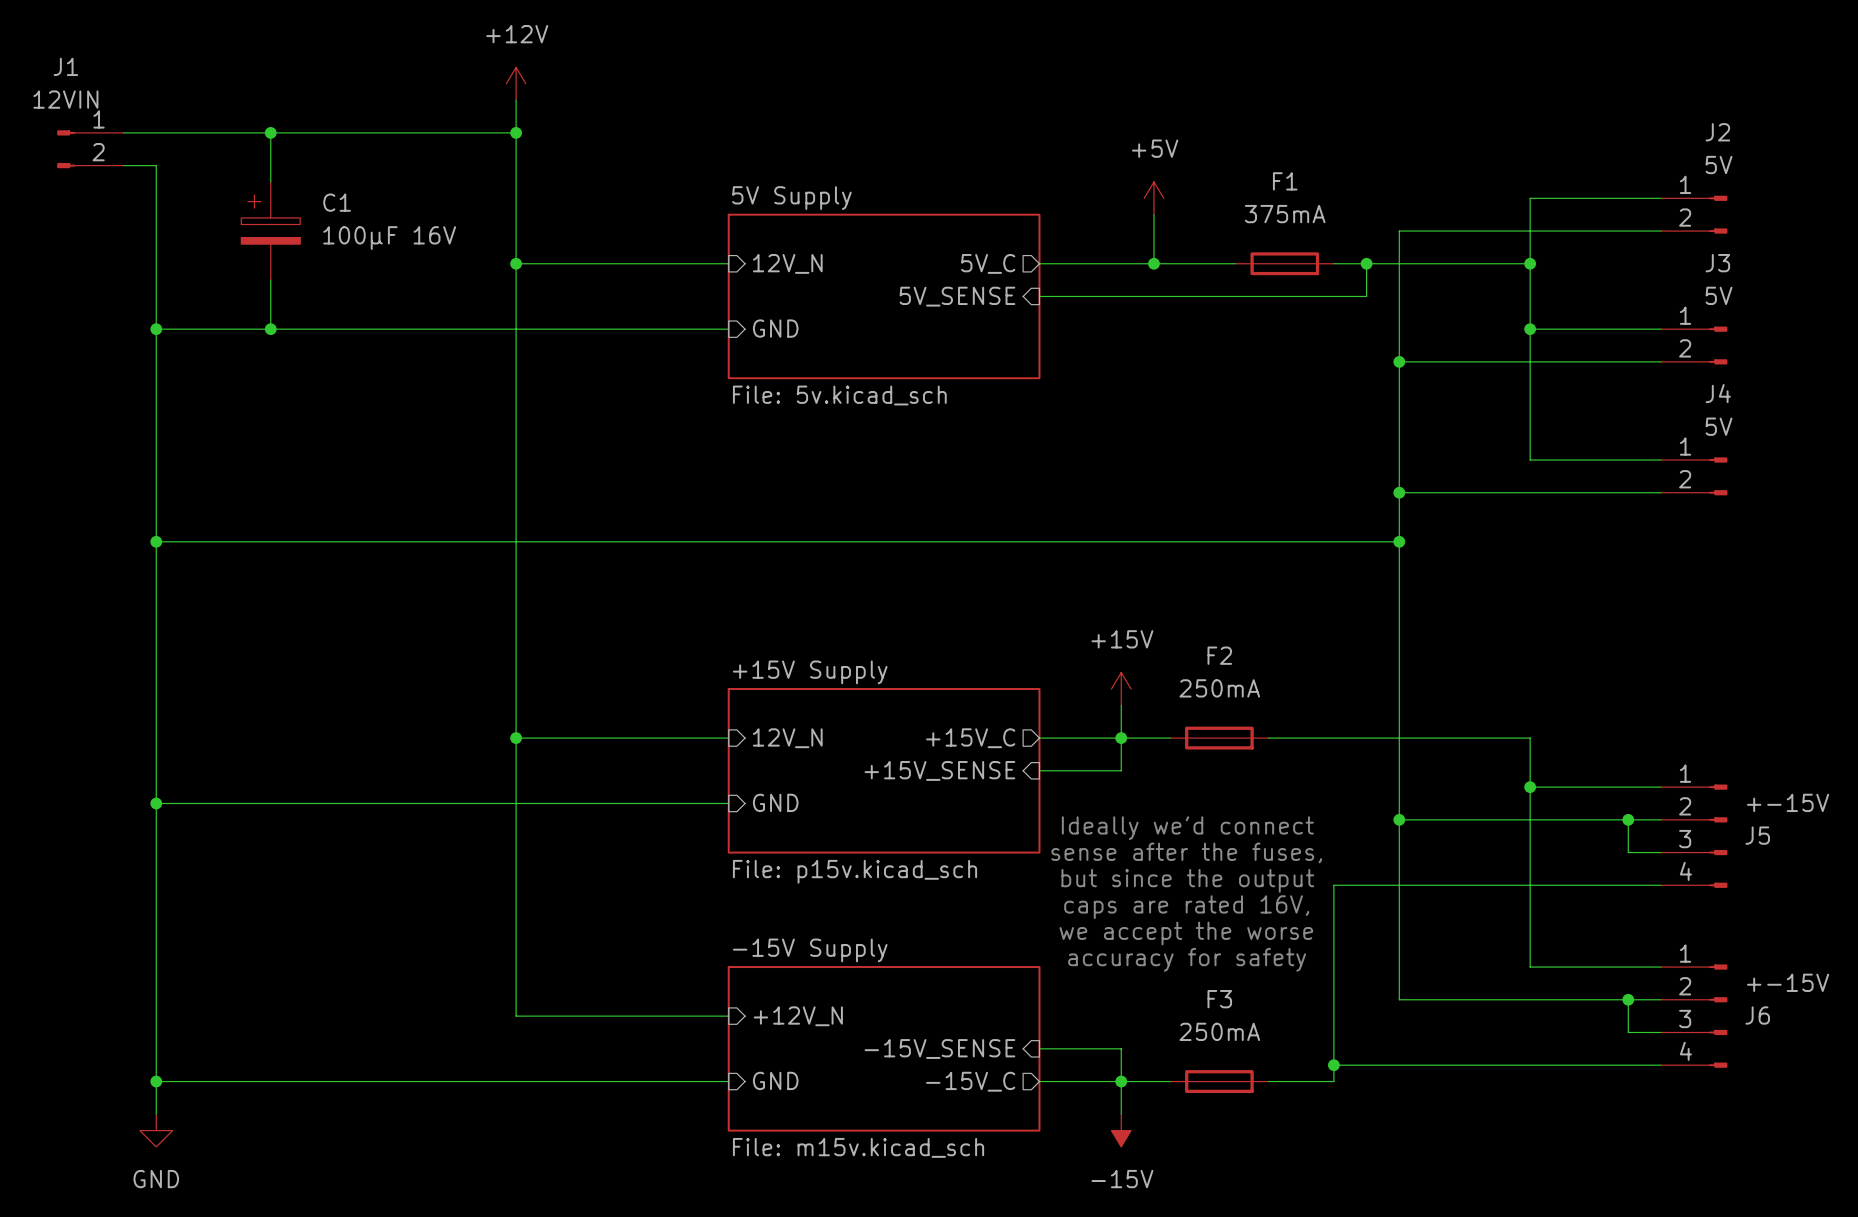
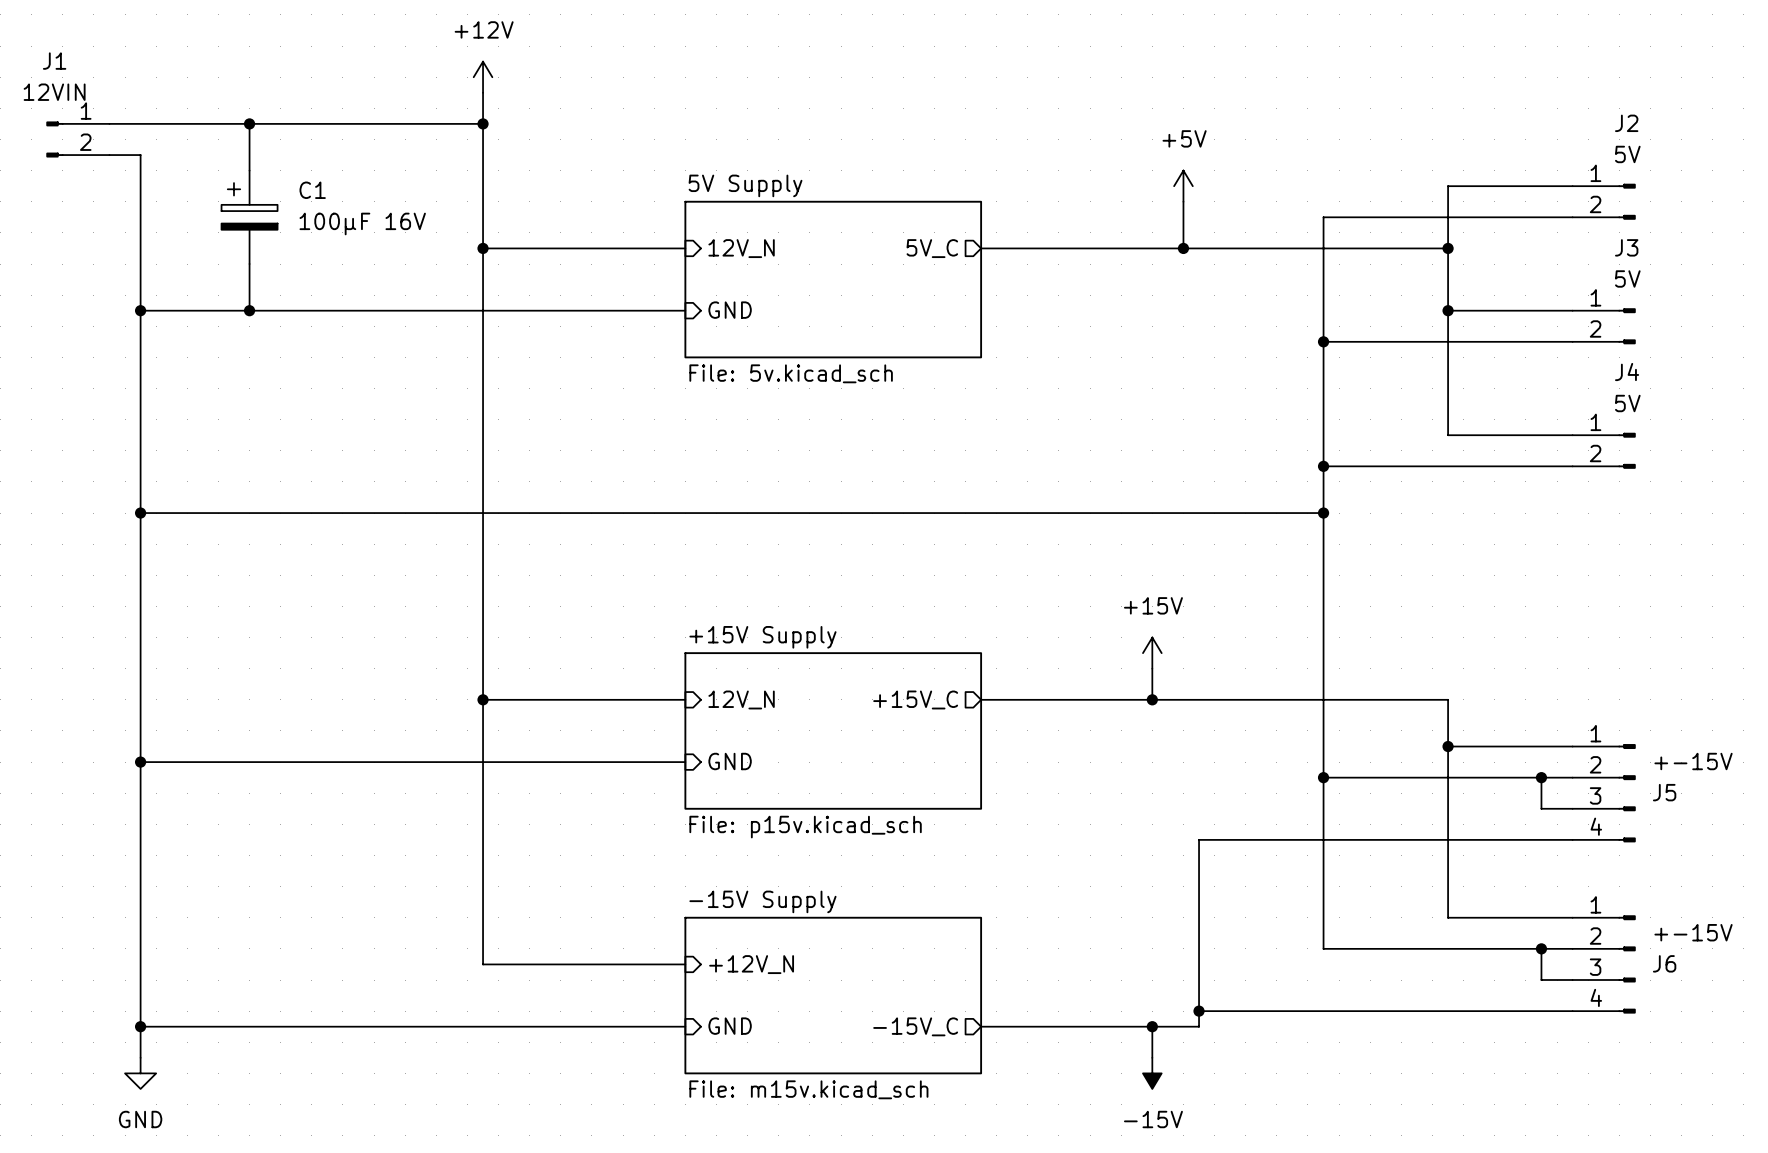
power symbol position: +5V (1153, 198) -> +5V (1183, 186)
wire: (1153, 214) (1153, 263) -> (1183, 201) (1183, 248)
junction: (1153, 263) -> none
junction: none -> (1183, 248)
F1: 375mA (1284, 263) -> none
wire: (1366, 263) (1366, 296) (1039, 296) -> none
junction: (1366, 263) -> none
sheet pin: 5V_SENSE (957, 296) -> none
power symbol position: +15V (1121, 689) -> +15V (1152, 653)
wire: (1121, 705) (1121, 770) (1039, 770) -> none
wire: none -> (1152, 668) (1152, 699)
junction: (1121, 738) -> none
junction: none -> (1152, 699)
F2: 250mA (1219, 738) -> none
sheet pin: +15V_SENSE (939, 770) -> none
text: Ideally we'd connect (1187, 828) -> none
text: sense after the fuses, (1186, 852) -> none
text: but since the output (1187, 880) -> none
wire: (1333, 885) (1333, 1081) (1268, 1081) -> (1261, 839) (1199, 839) (1199, 1026) (1105, 1026)
text: caps are rated 16V, (1186, 907) -> none
text: we accept the worse (1186, 933) -> none
text: accuracy for safety (1187, 959) -> none
wire: (1039, 1048) (1121, 1048) (1121, 1114) -> none
sheet pin: -15V_SENSE (939, 1049) -> none
wire: none -> (1199, 1011) (1261, 1011)
junction: none -> (1199, 1011)
junction: (1333, 1065) -> none
junction: (1121, 1081) -> none
wire: none -> (1152, 1026) (1152, 1057)
junction: none -> (1152, 1026)
F3: 250mA (1219, 1081) -> none
power symbol position: -15V (1121, 1130) -> -15V (1152, 1073)

